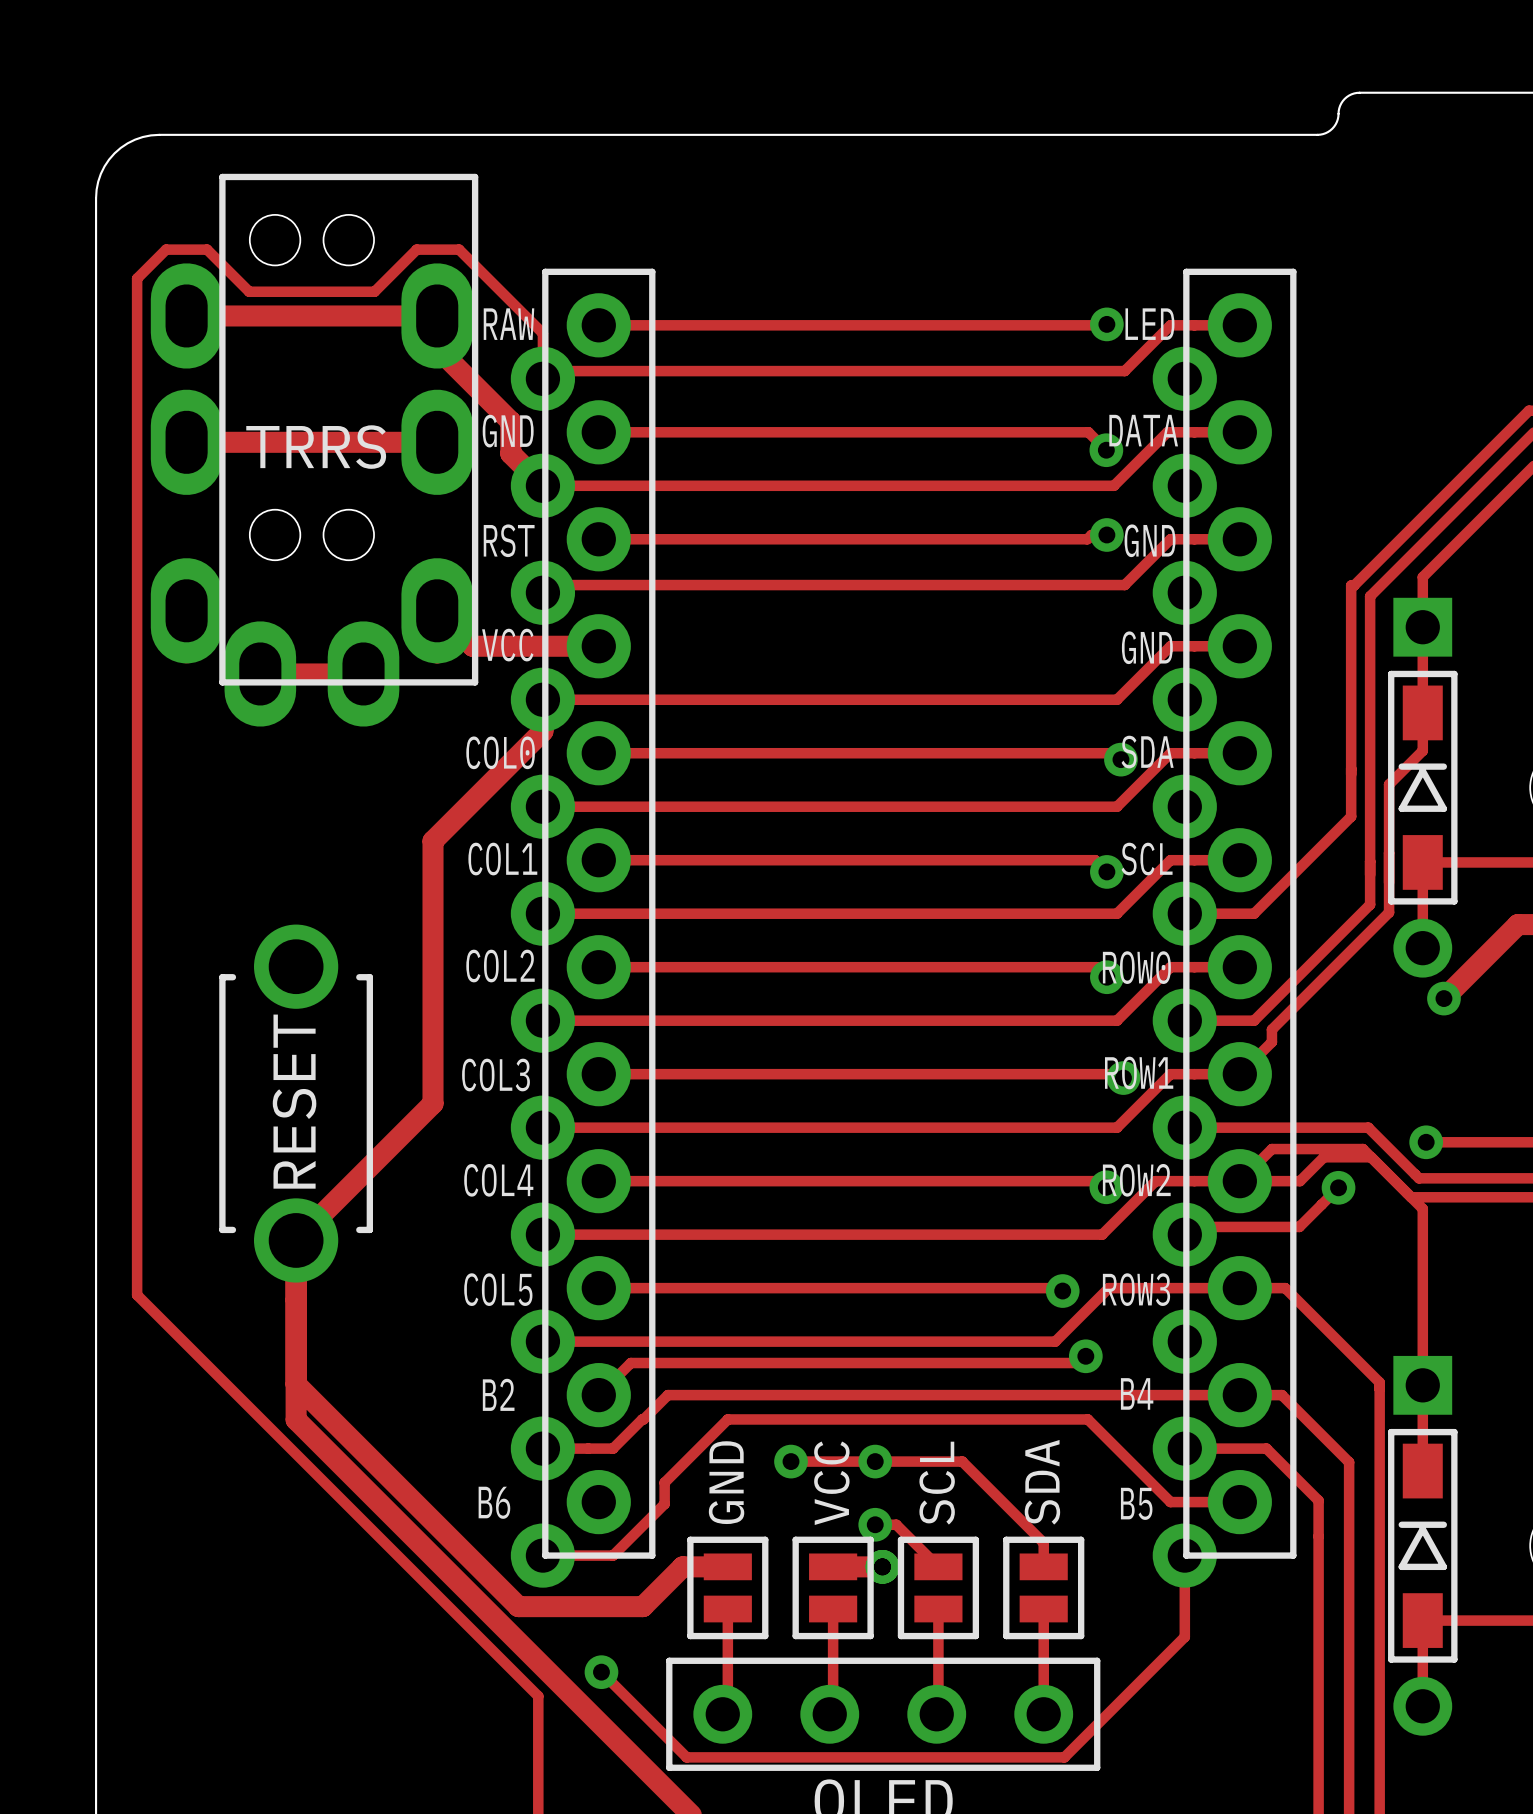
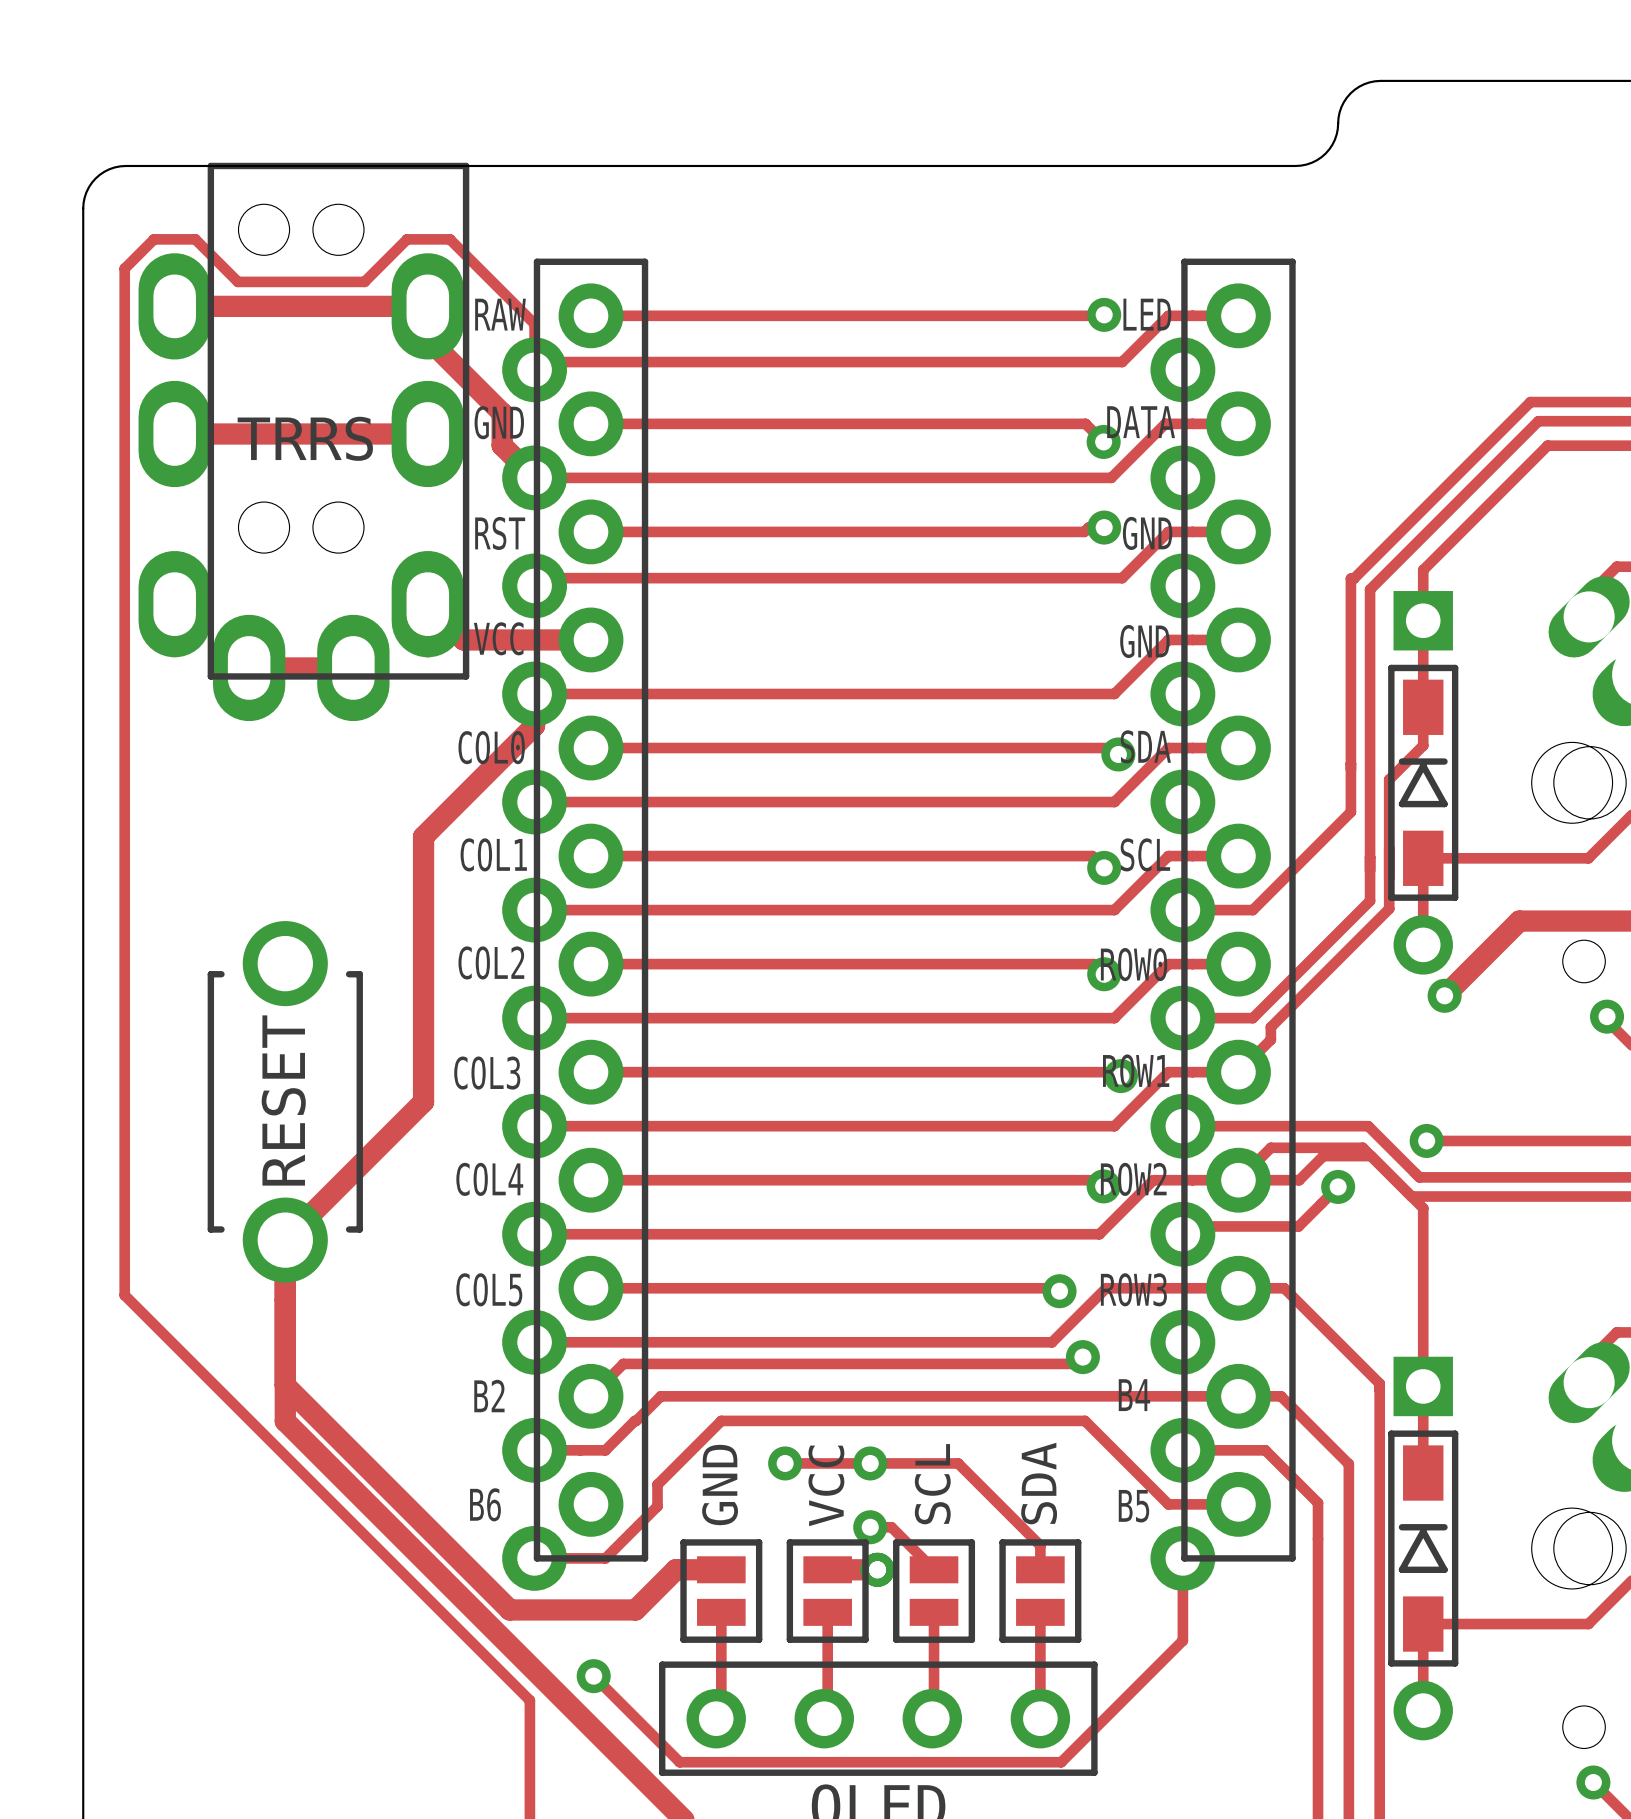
board edge: (1380, 92) (1356, 92) (1349, 95) (1340, 105) (1334, 126) (1328, 132) (1317, 134) (150, 135) (135, 139) (120, 147) (104, 166) (96, 189) (96, 219) -> (1380, 80) (1364, 84) (1350, 93) (1341, 107) (1336, 134) (1329, 149) (1316, 160) (1301, 165) (125, 165) (109, 169) (95, 178) (86, 192) (83, 208)

